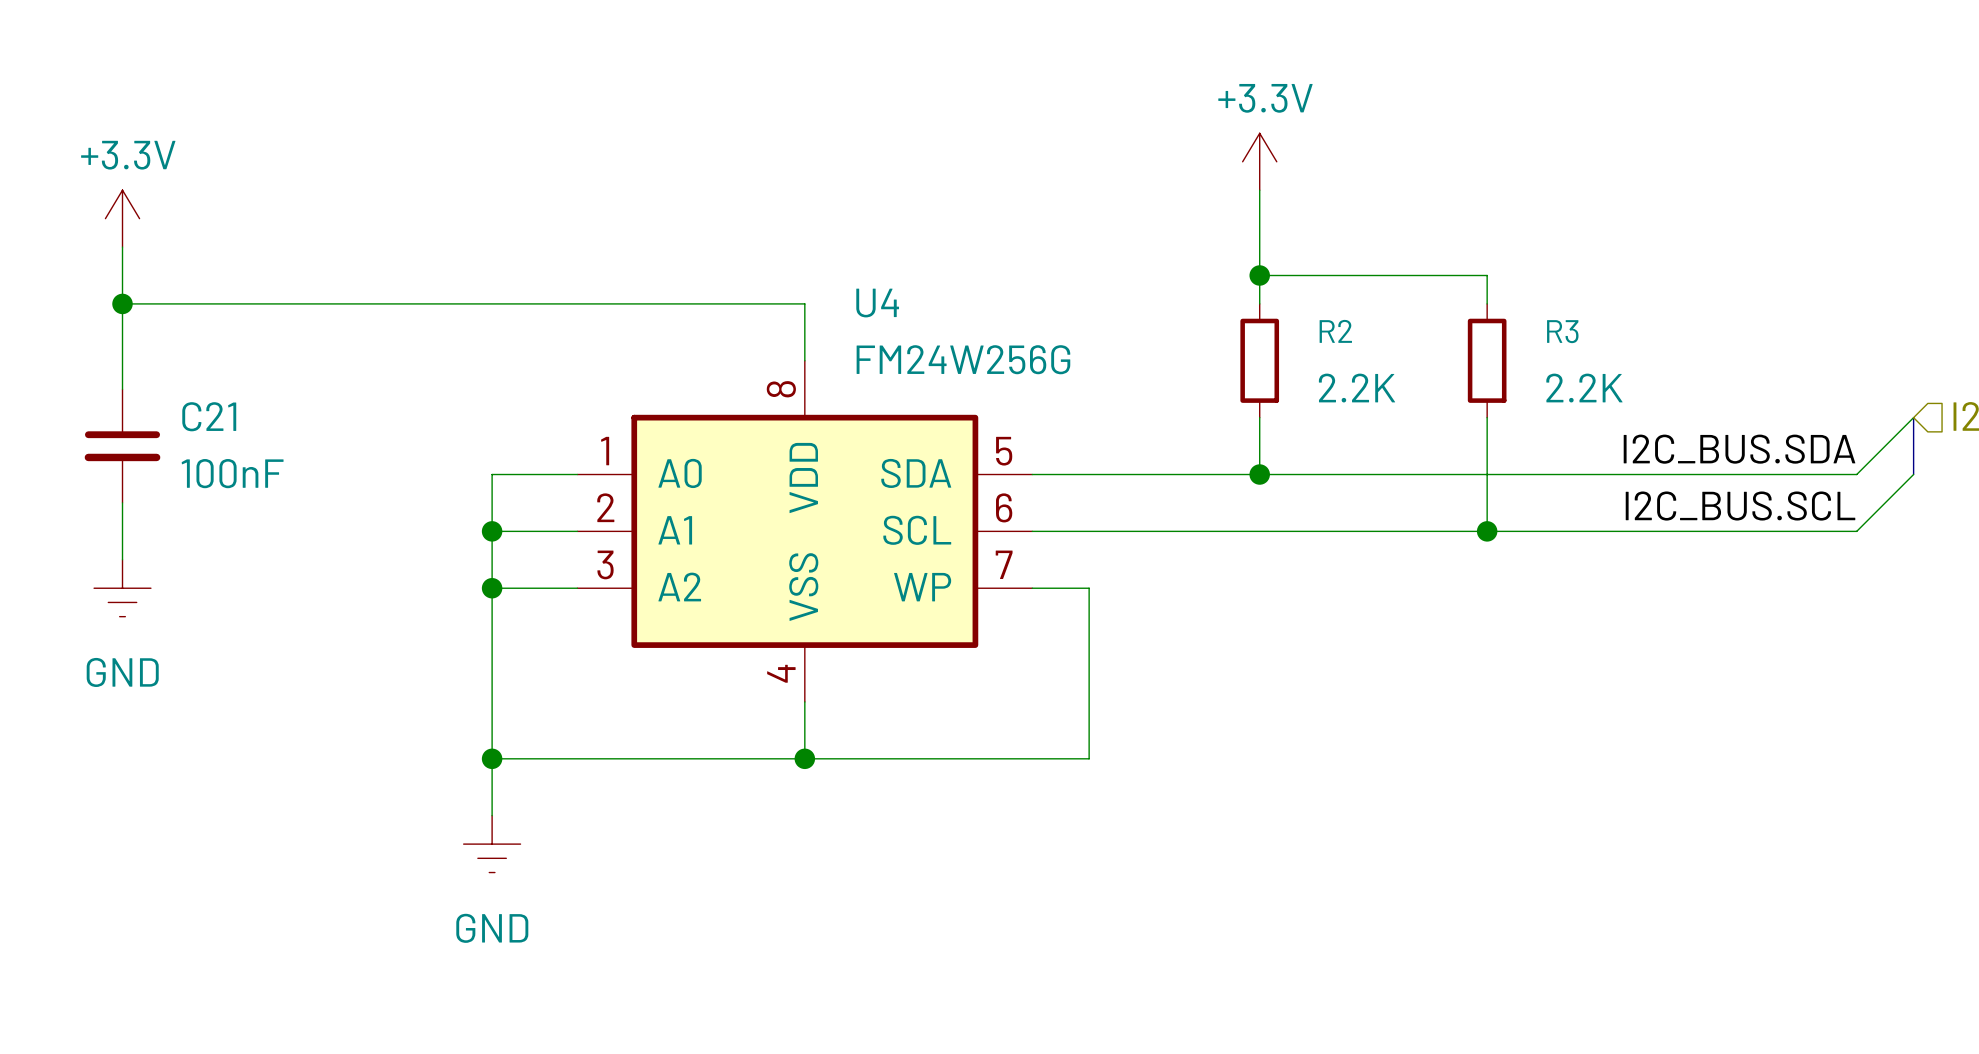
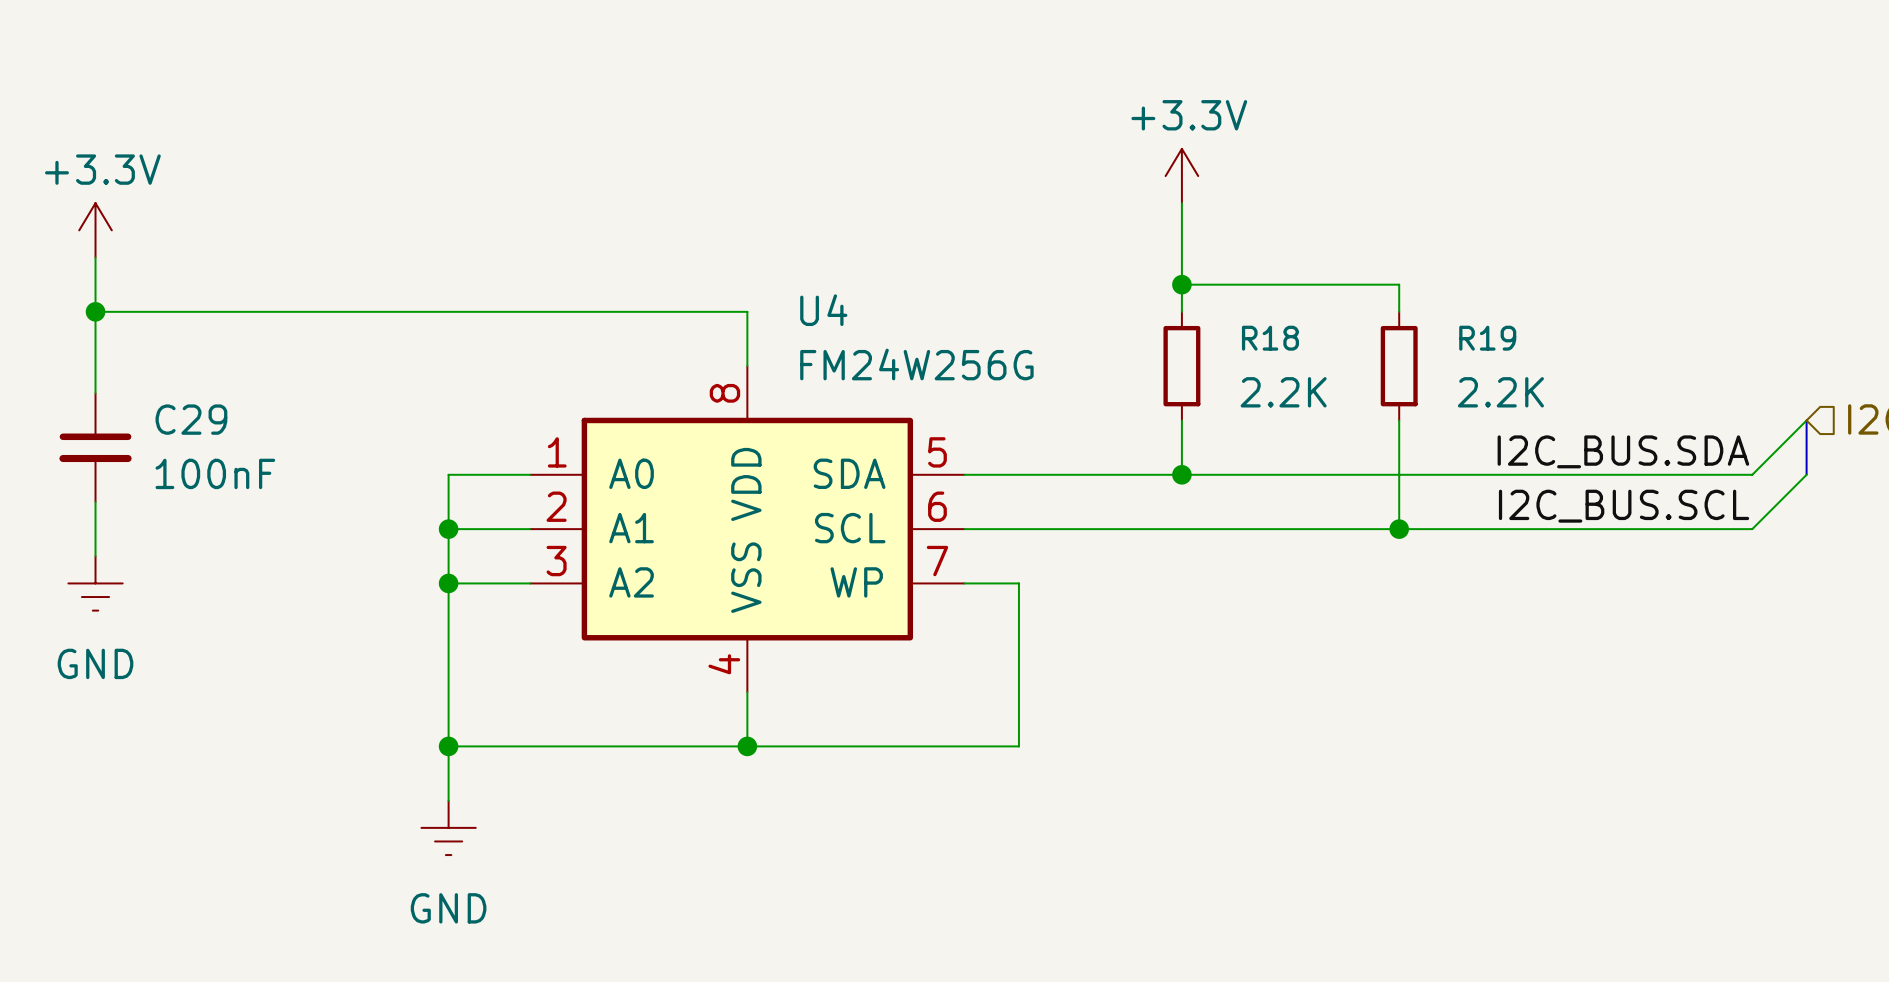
R2 name: R2 (1335, 331) -> R18 (1270, 338)
R3 name: R3 (1562, 331) -> R19 (1487, 338)
C21 name: C21 (209, 416) -> C29 (191, 419)

